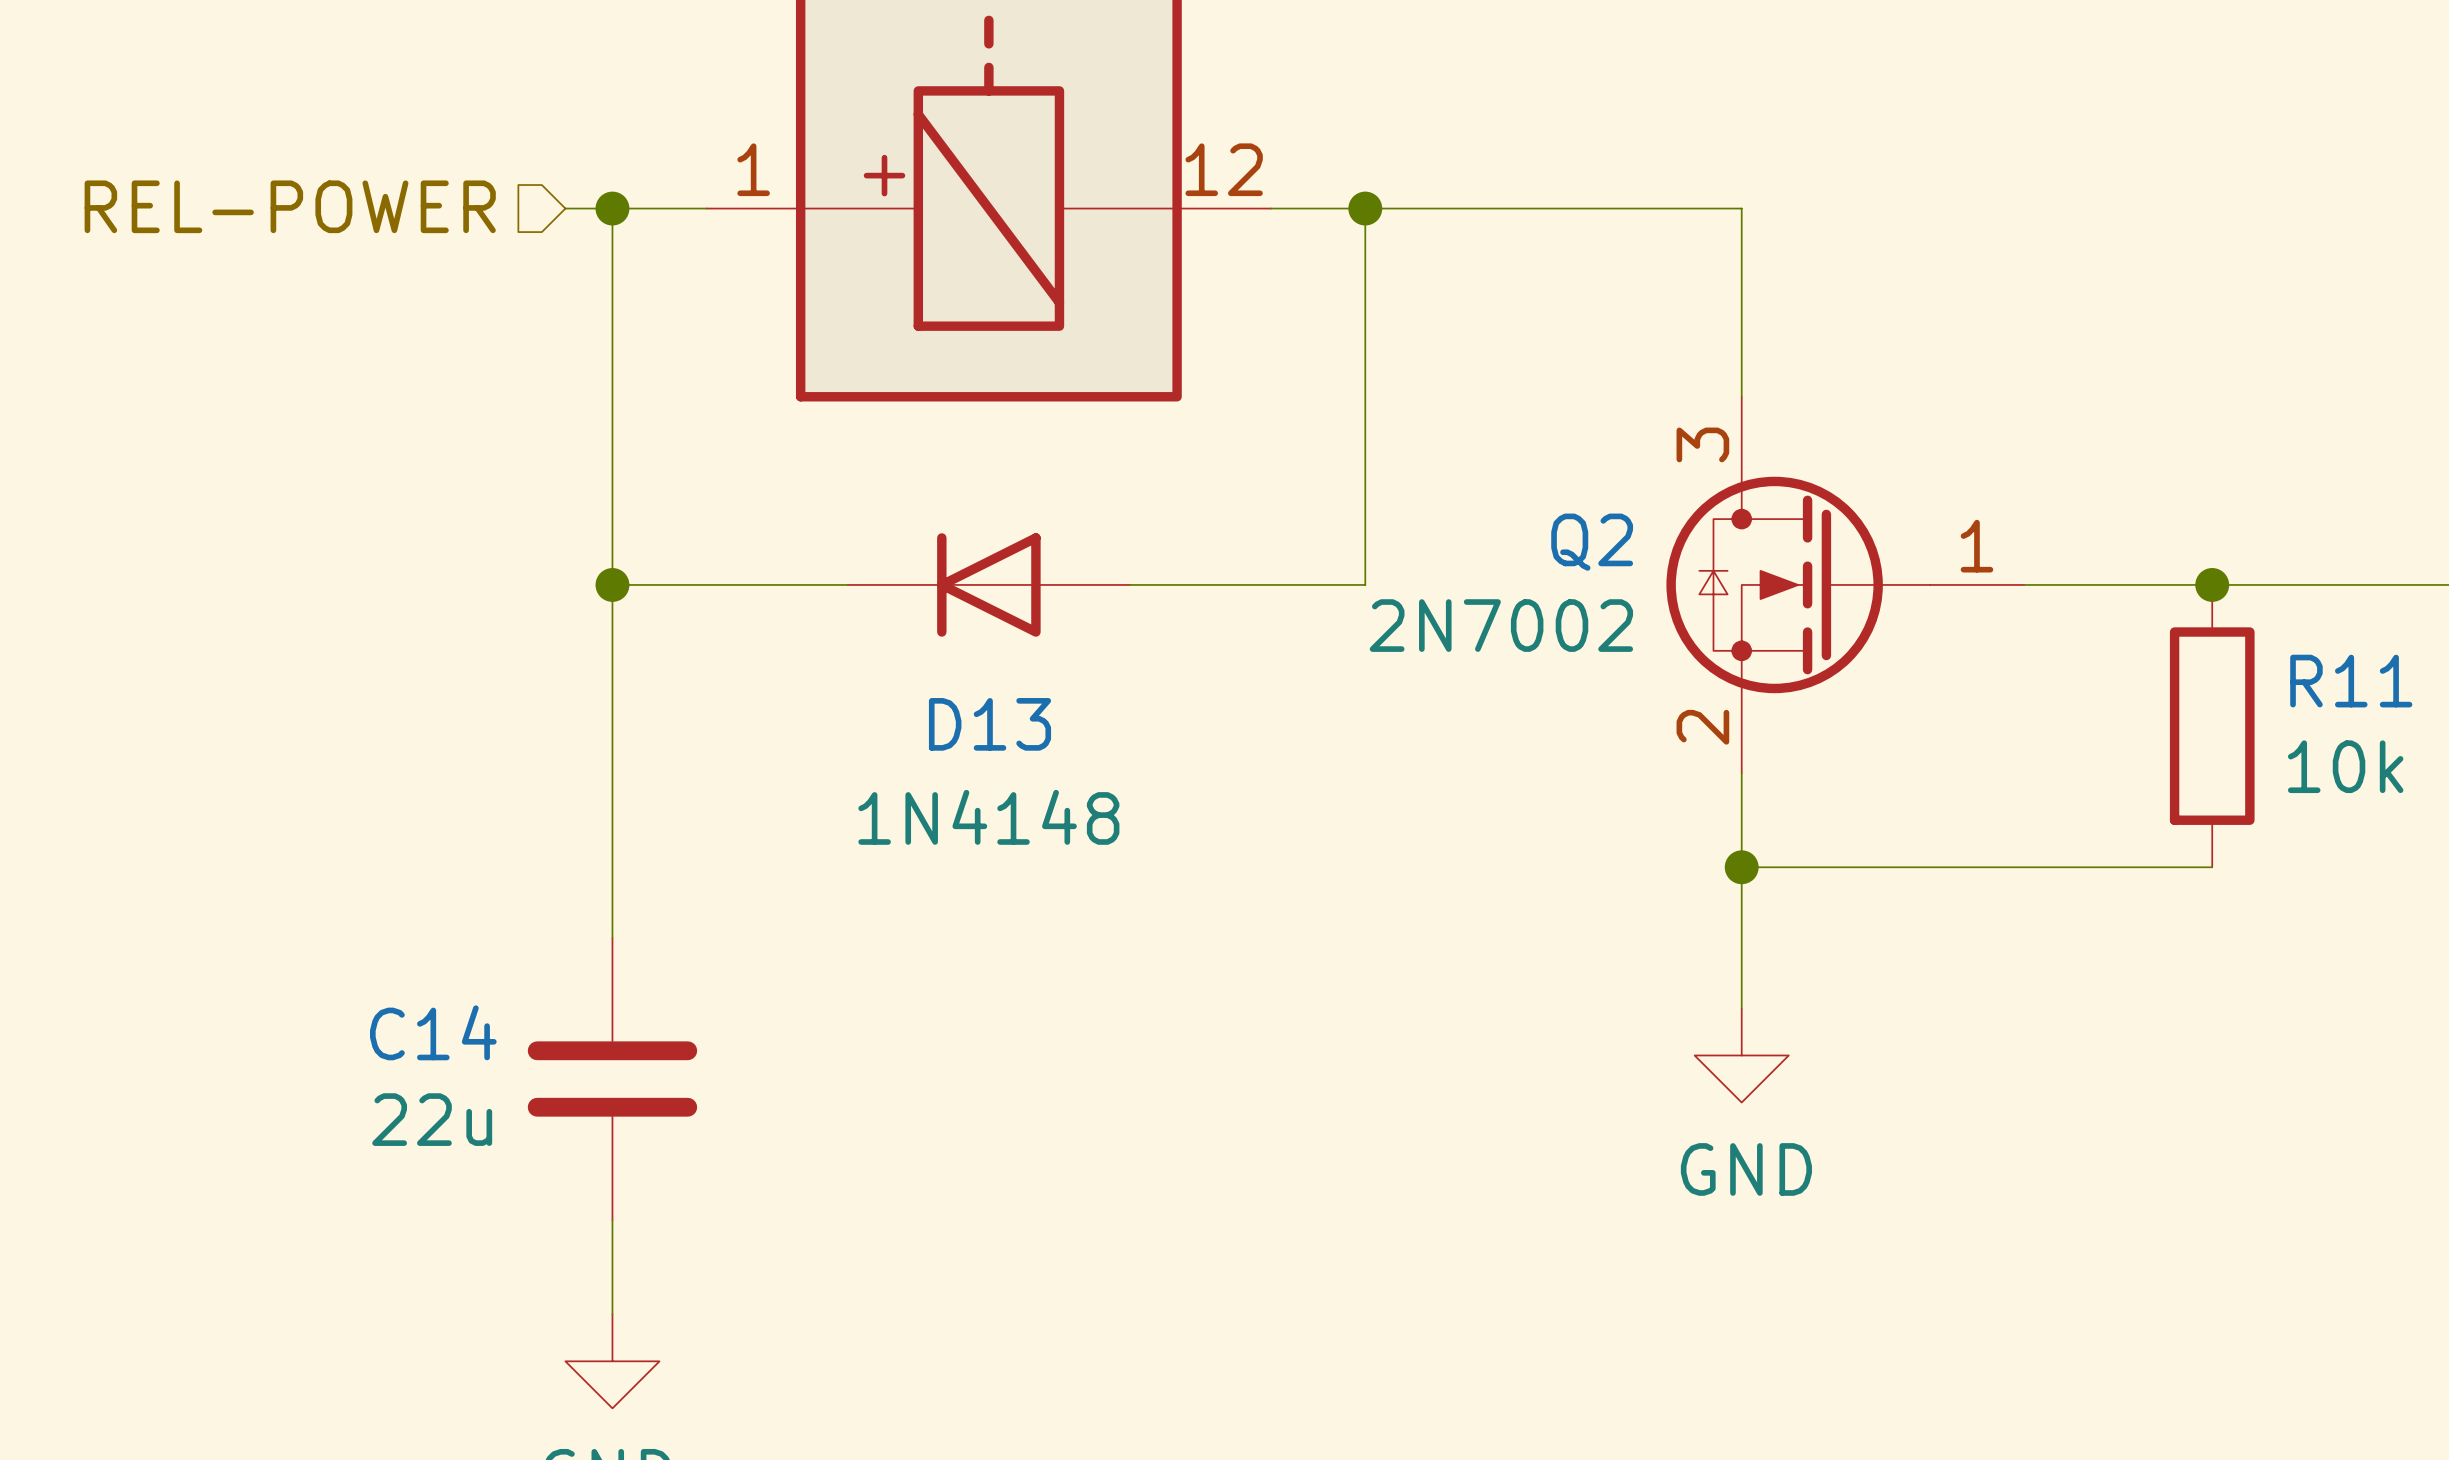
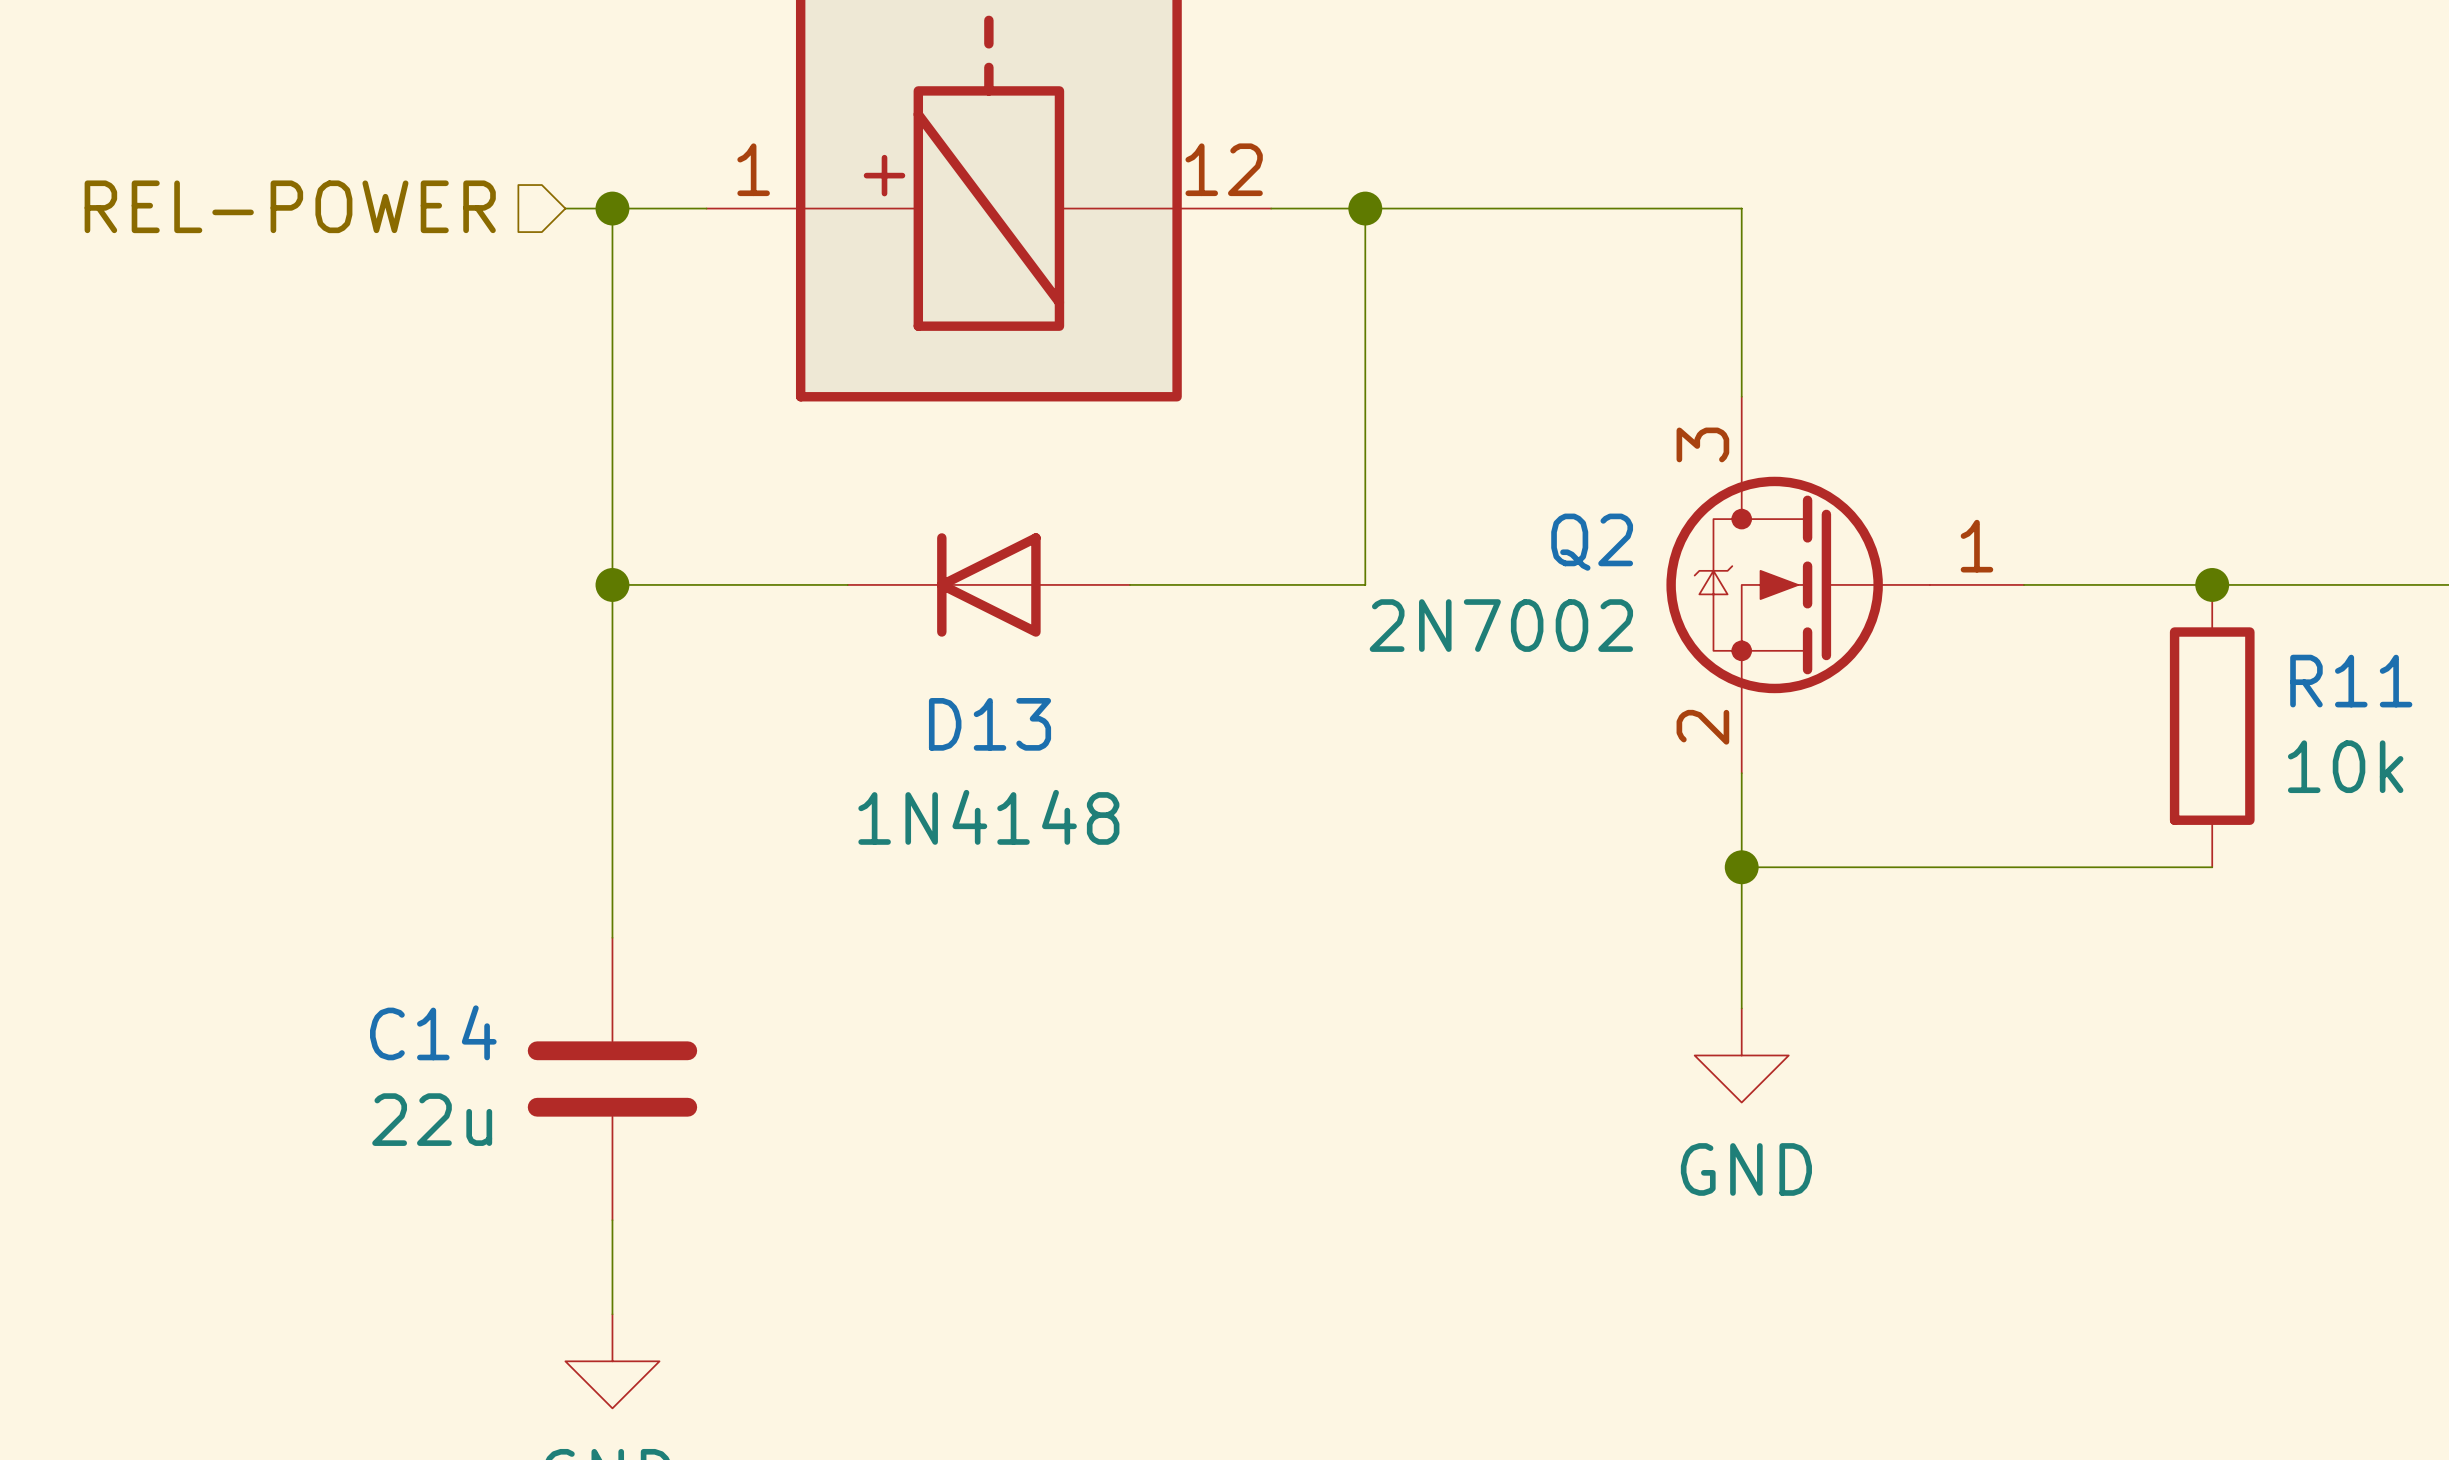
Q2 symbol: [1666, 396, 2025, 774] -> [1666, 396, 2025, 774]

